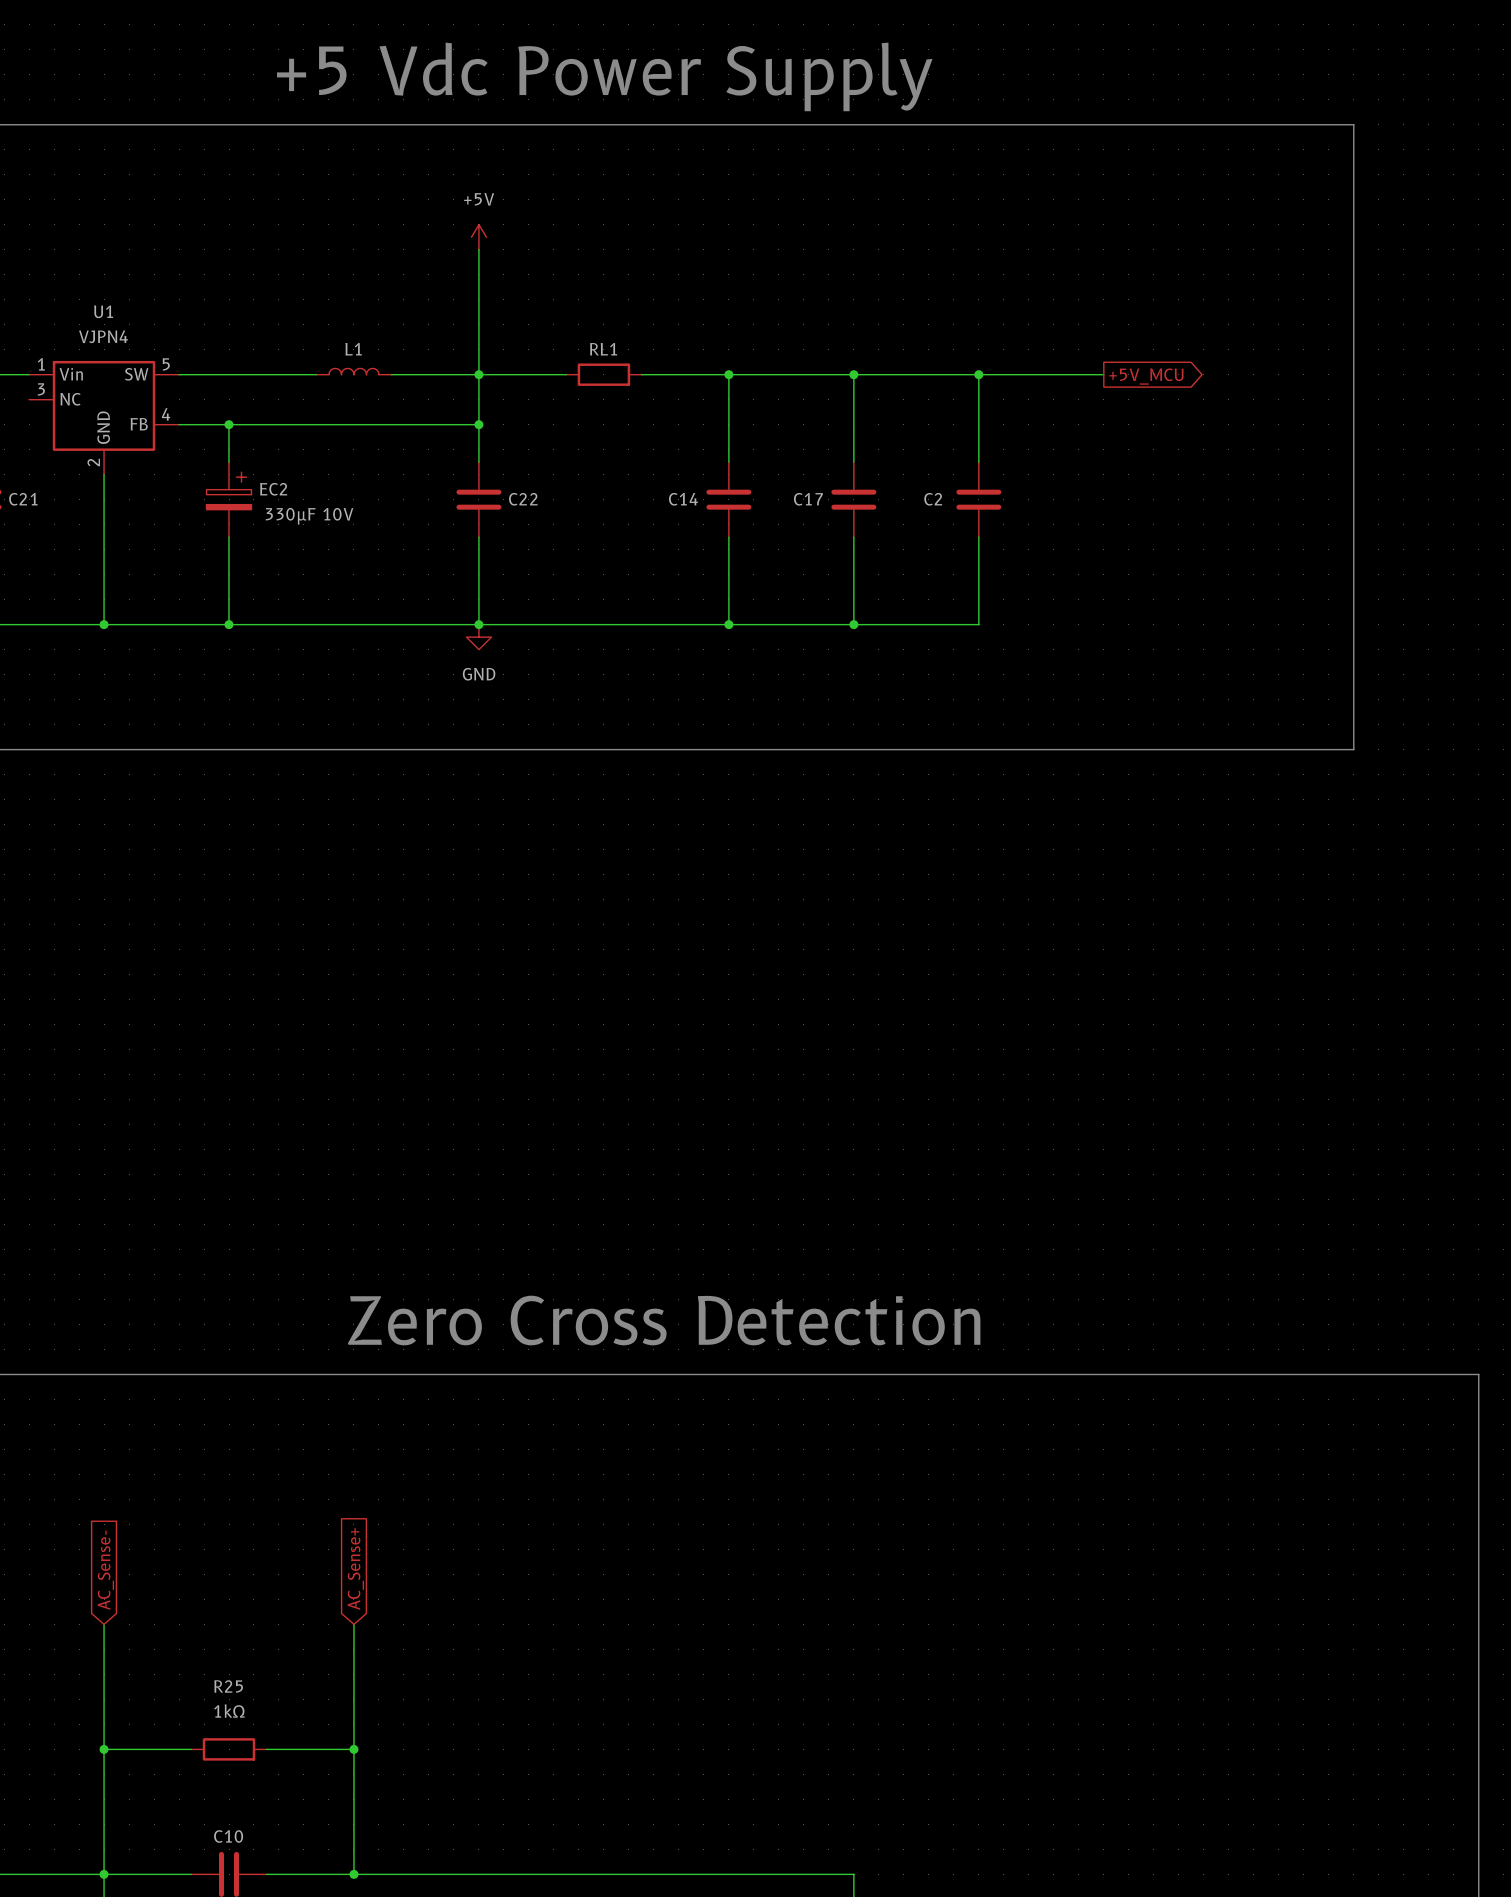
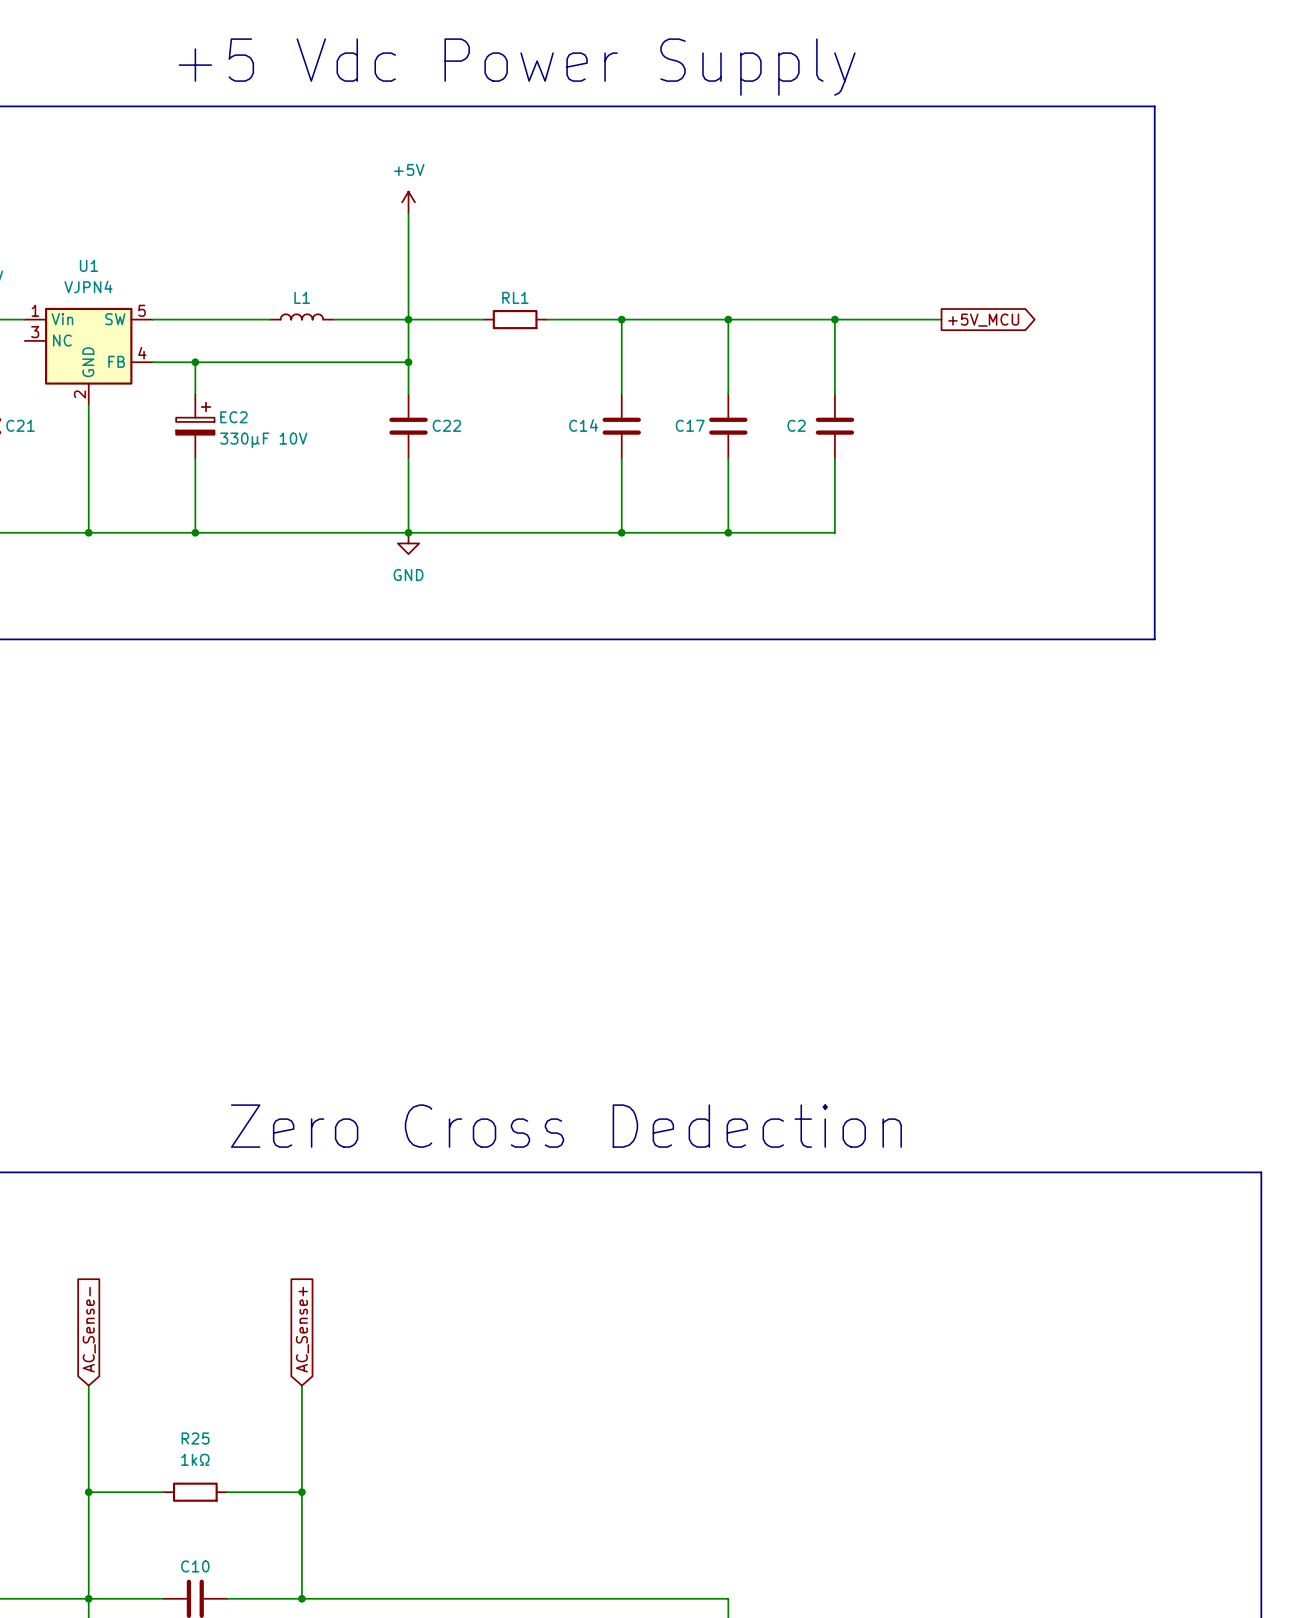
text: Zero Cross Detection (664, 1320) -> Zero Cross Dedection (566, 1126)

